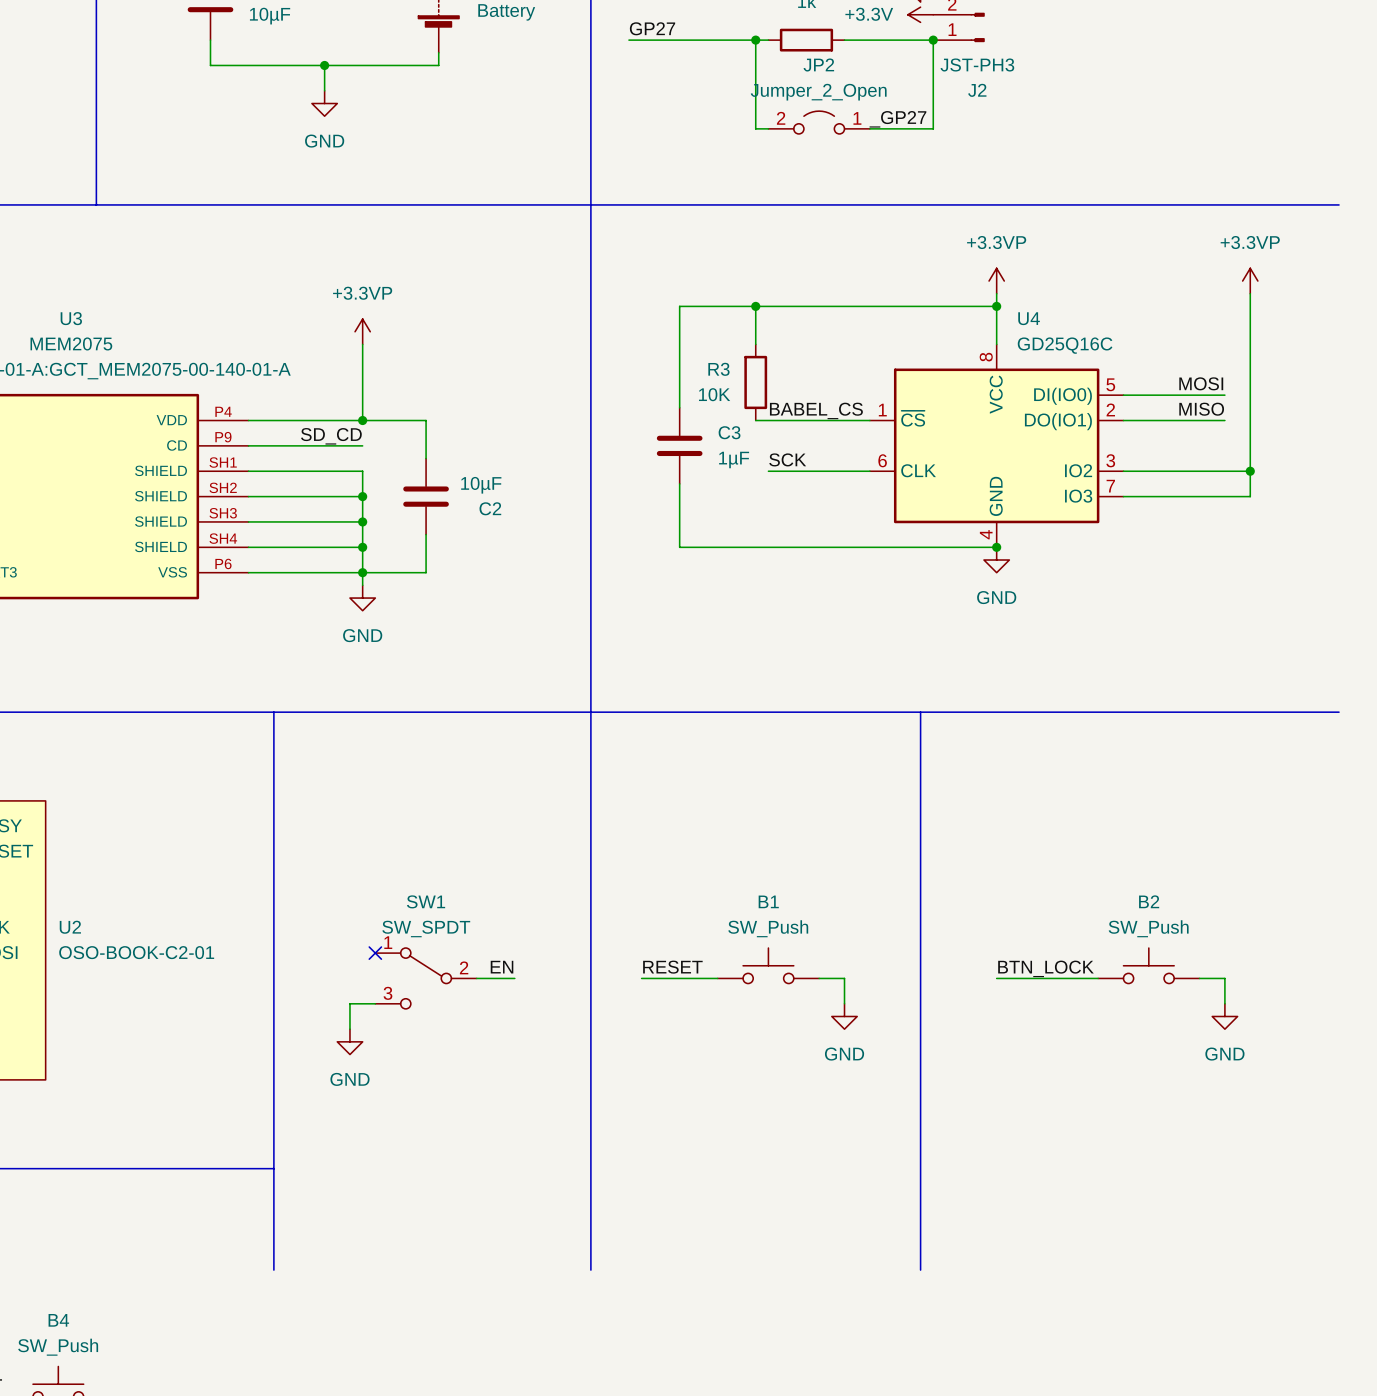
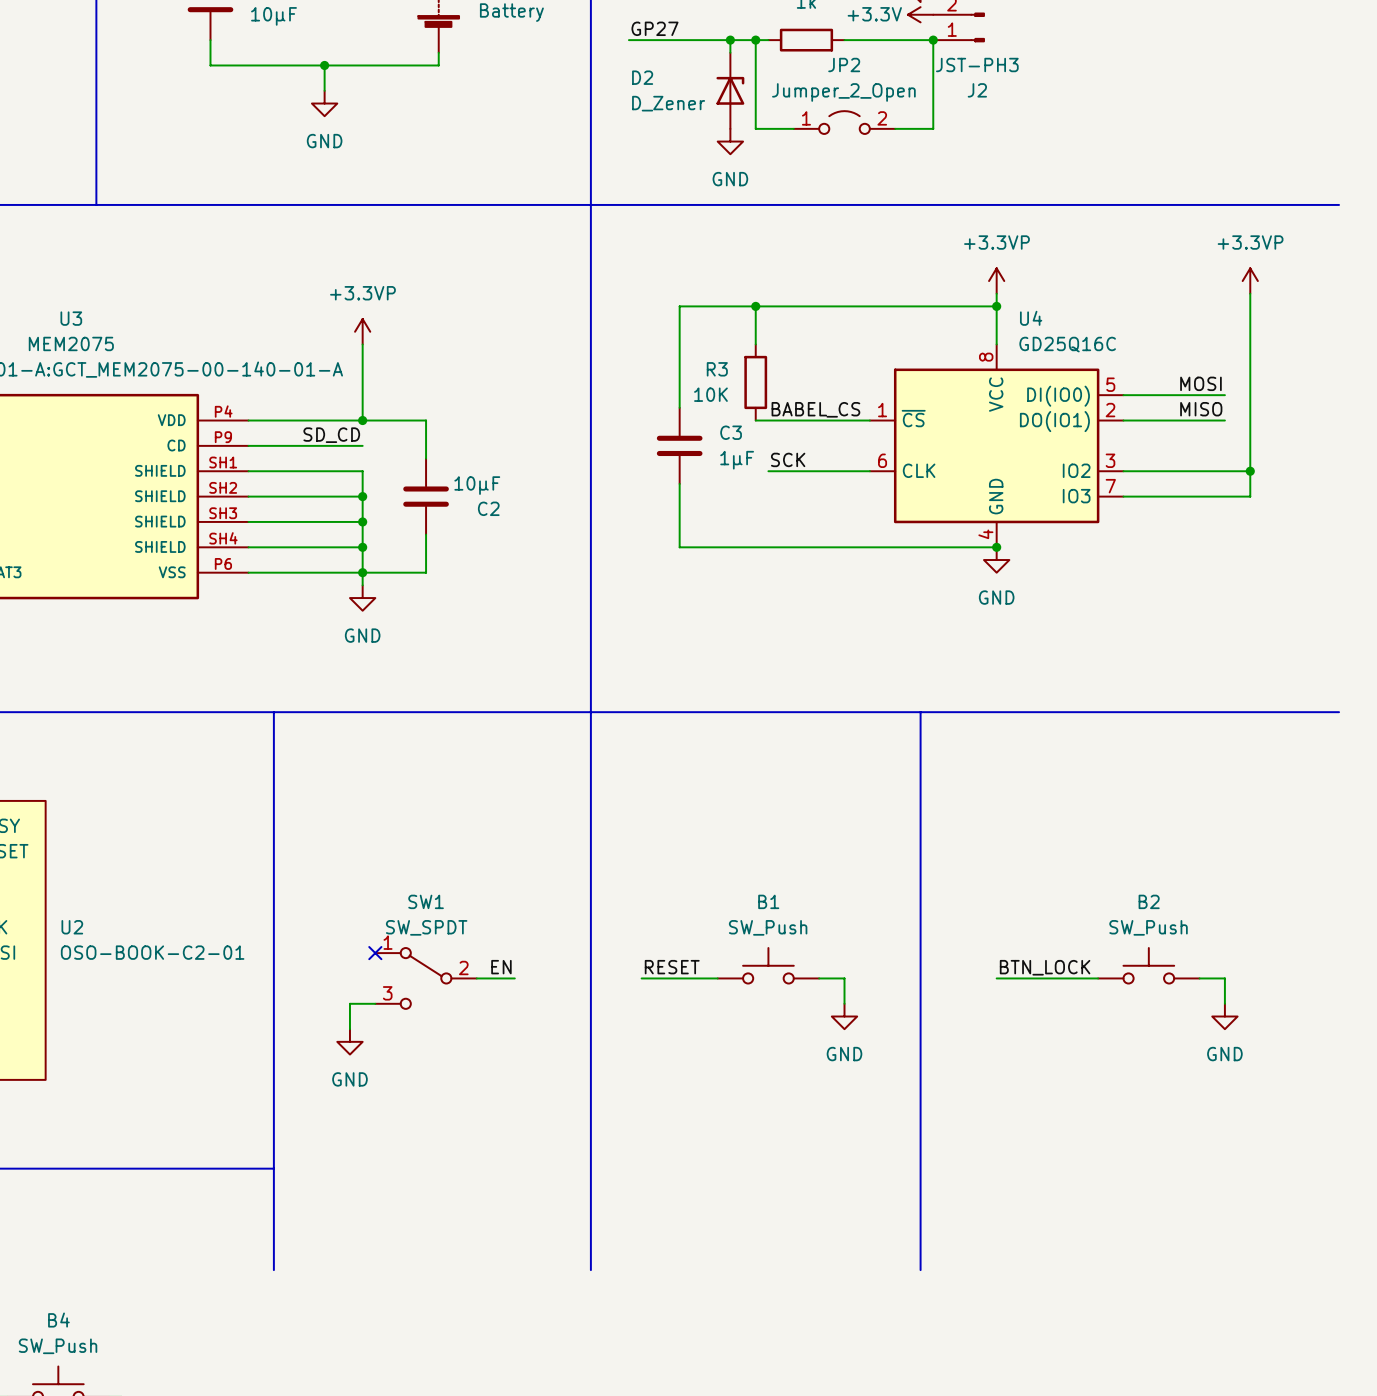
wire: none -> (730, 40) (730, 52)
junction: none -> (730, 40)
D2: none -> D_Zener (730, 90)
label: _GP27 (897, 119) -> none
JP2 flip: as is (819, 122) -> left-right (844, 122)
power symbol: none -> GND (730, 141)

